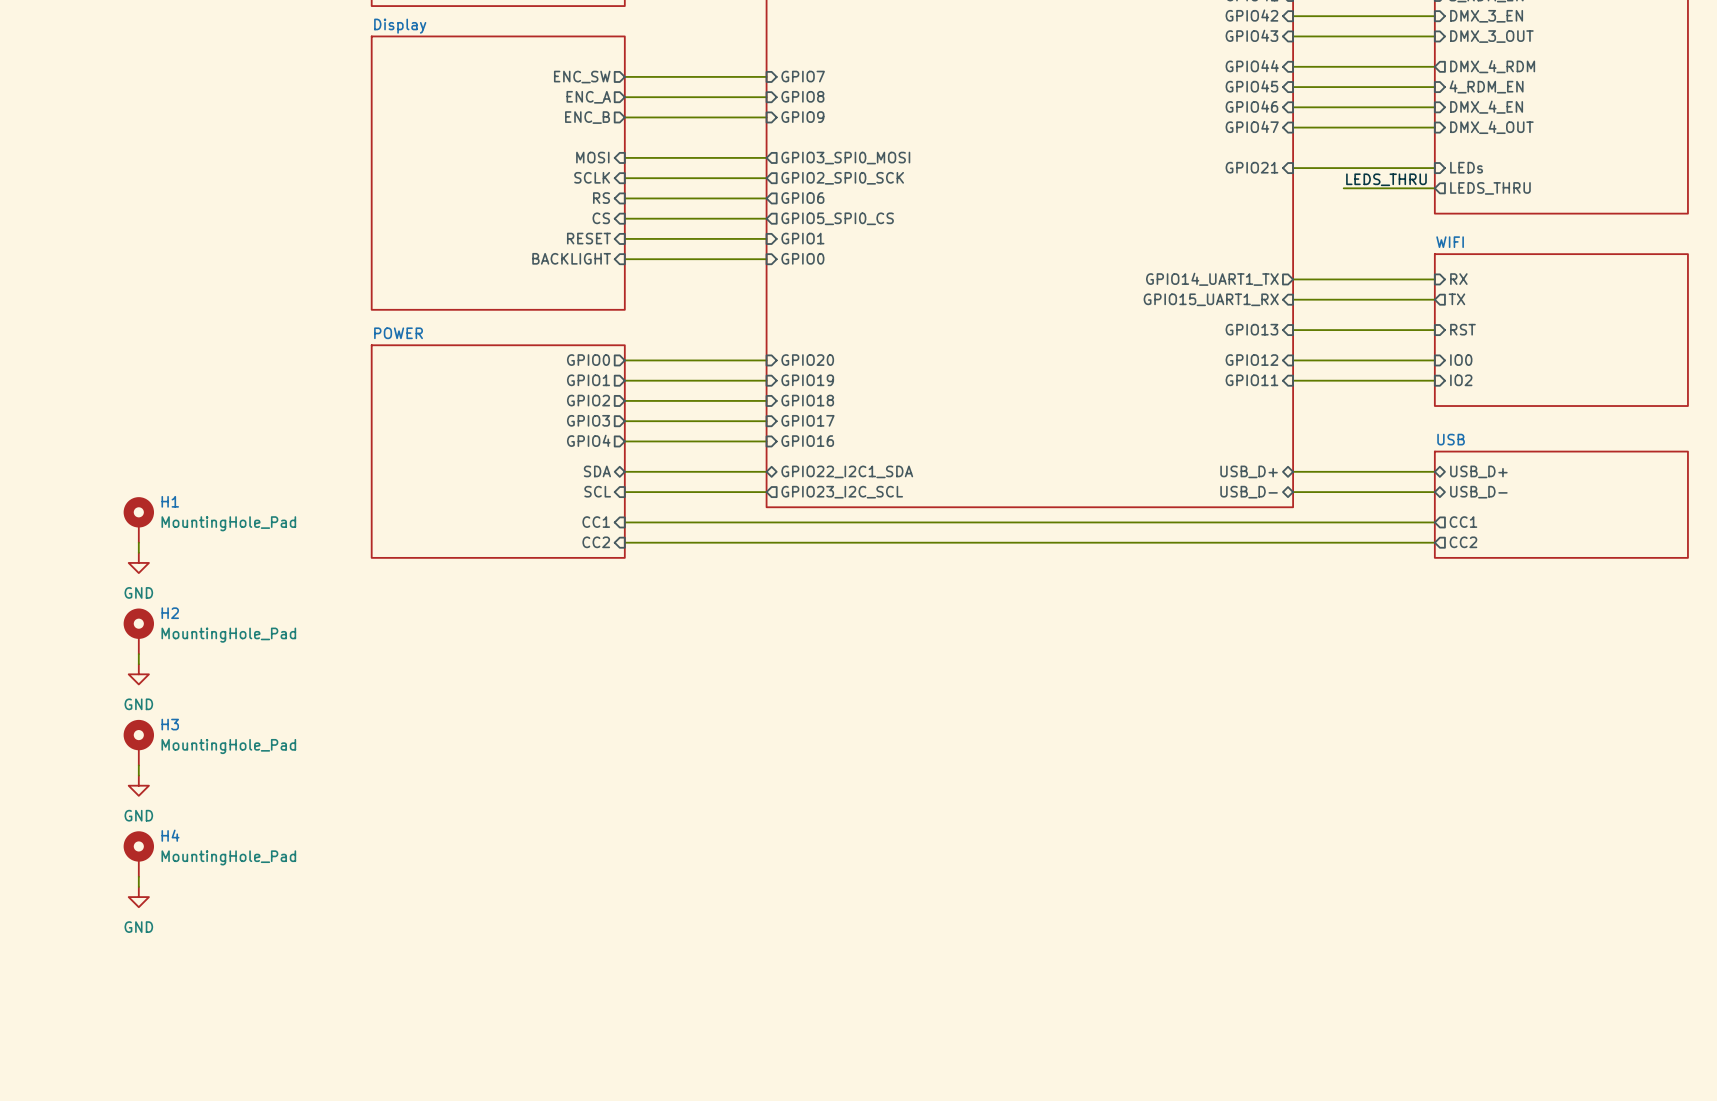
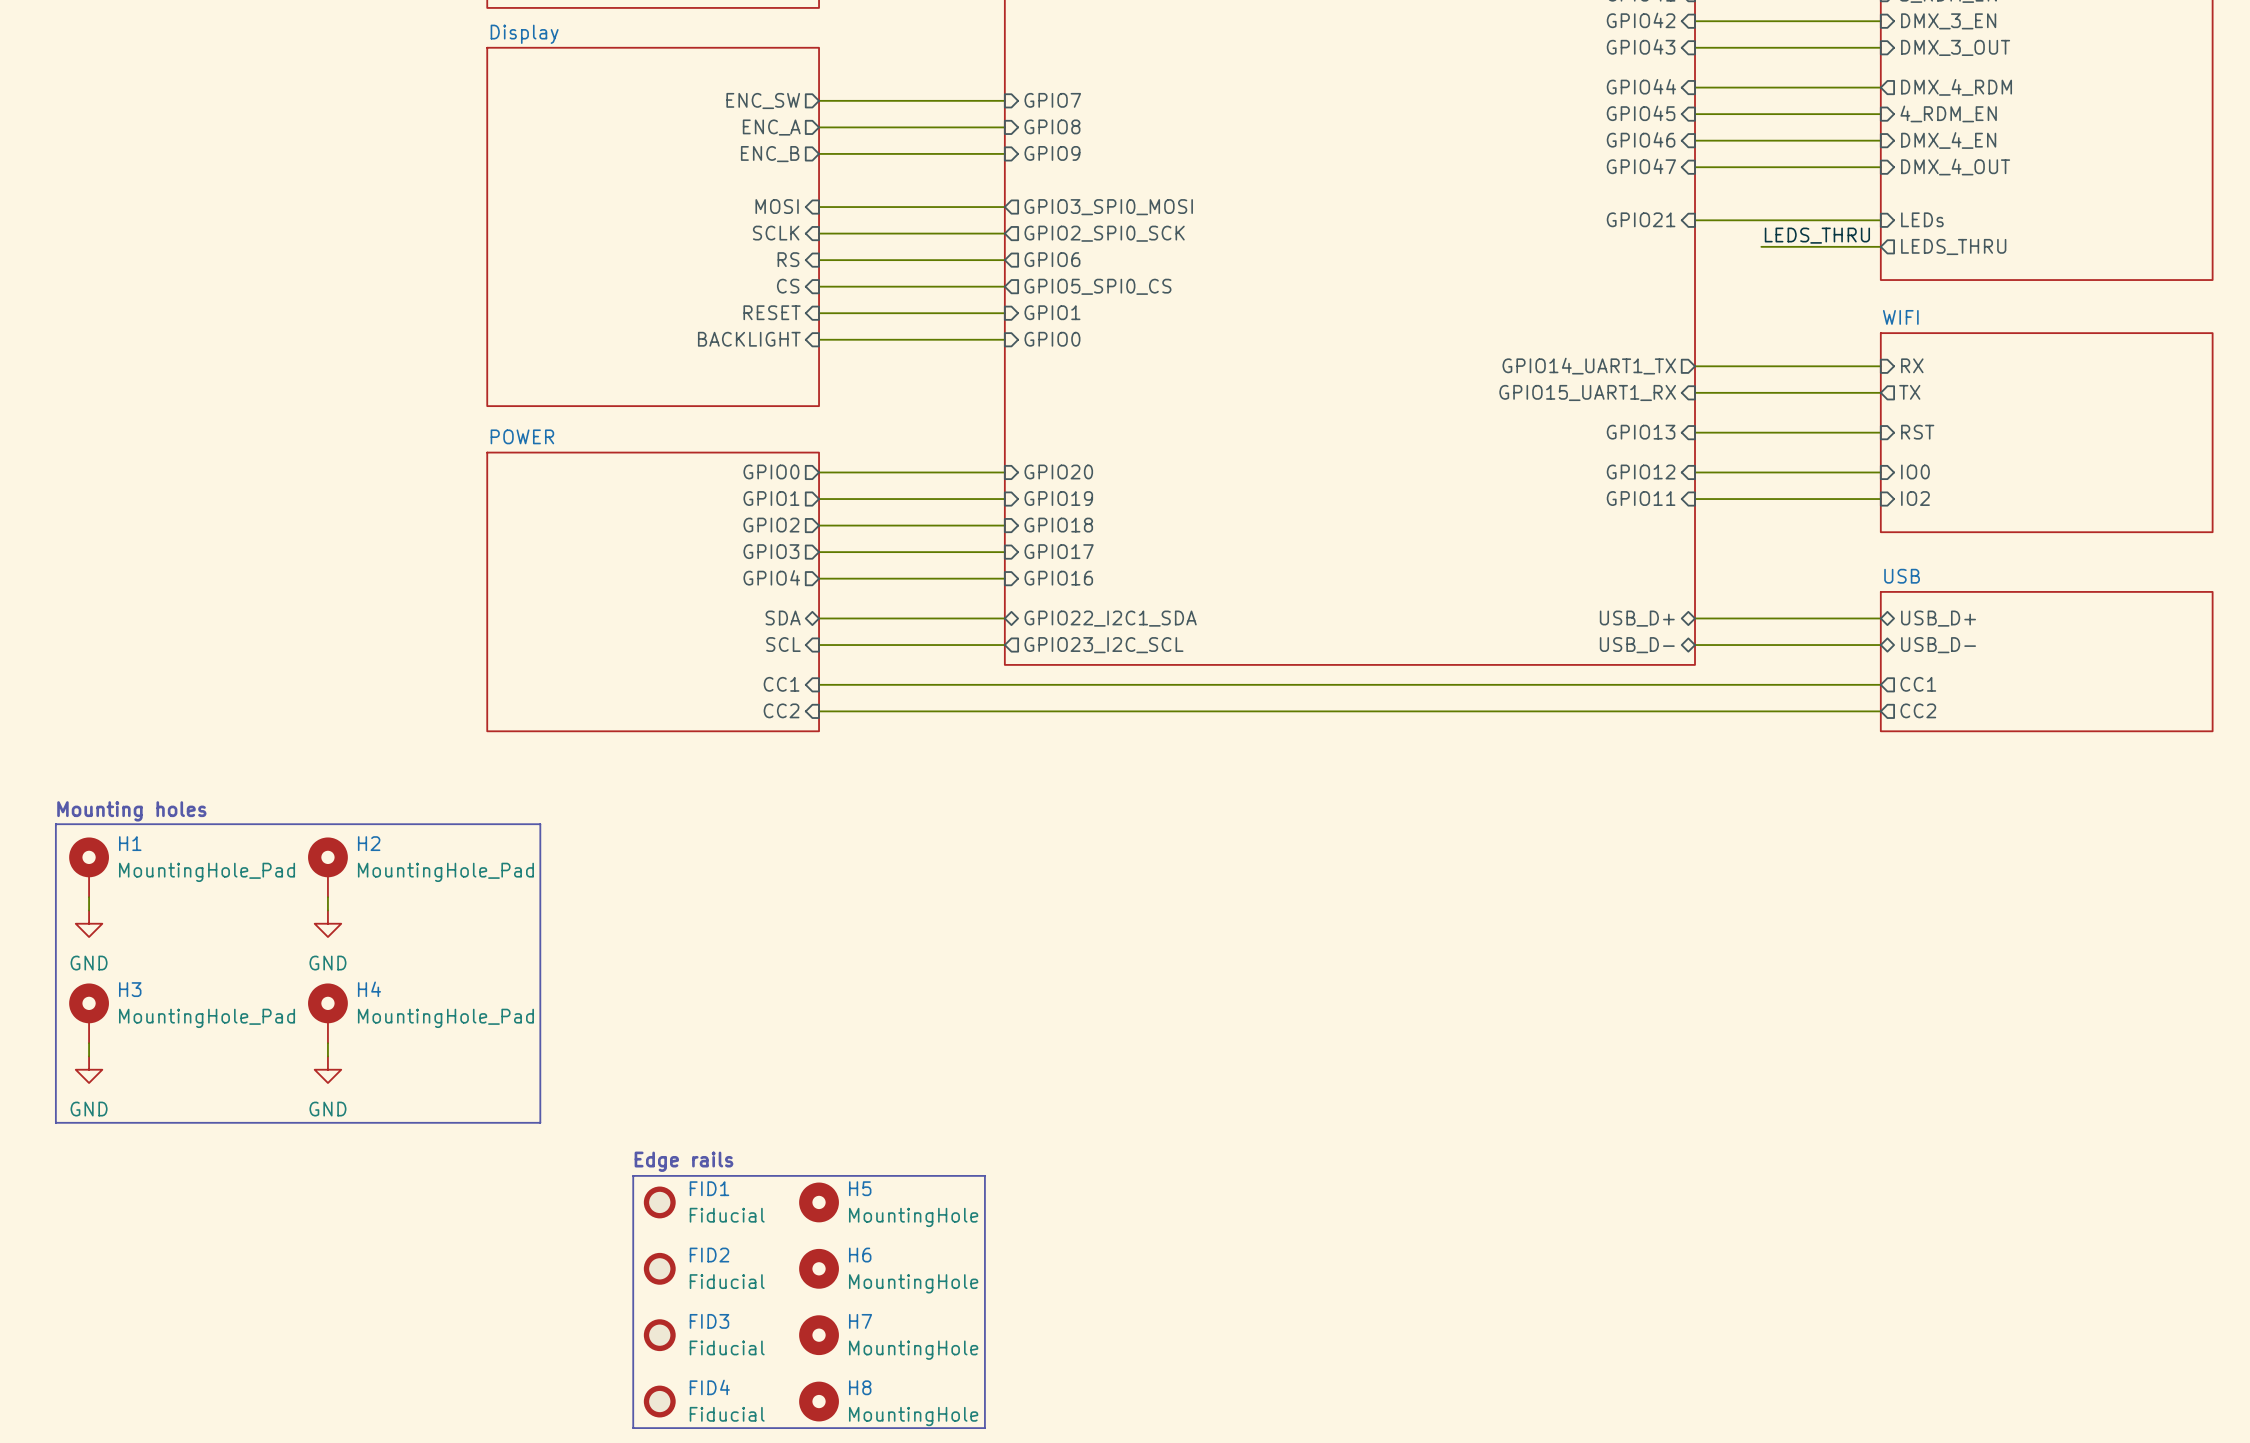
H1 position: (138, 519) -> (89, 867)
wire: (138, 542) (138, 552) -> (327, 897) (327, 910)
power symbol: GND (138, 562) -> none
text: none -> Mounting holes (131, 811)
line: none -> (55, 824) (540, 824) (540, 1122) (55, 1122) (55, 824)
H2 position: (138, 631) -> (327, 867)
wire: (138, 654) (138, 664) -> (89, 897) (89, 910)
power symbol: GND (138, 674) -> none
power symbol: none -> GND (89, 923)
power symbol: none -> GND (327, 923)
H3 position: (138, 742) -> (89, 1013)
wire: (138, 765) (138, 775) -> (89, 1043) (89, 1056)
power symbol: GND (138, 785) -> none
power symbol: none -> GND (89, 1069)
power symbol: none -> GND (327, 1069)
H4 position: (138, 854) -> (327, 1013)
wire: (138, 876) (138, 886) -> (327, 1043) (327, 1056)
text: none -> Edge rails (683, 1161)
power symbol: GND (138, 897) -> none
line: none -> (633, 1175) (984, 1175) (984, 1428) (633, 1428) (633, 1175)
FID1: none -> Fiducial (659, 1202)
H5: none -> MountingHole (819, 1202)
FID2: none -> Fiducial (659, 1268)
H6: none -> MountingHole (819, 1268)
FID3: none -> Fiducial (659, 1335)
H7: none -> MountingHole (819, 1335)
FID4: none -> Fiducial (659, 1401)
H8: none -> MountingHole (819, 1401)

